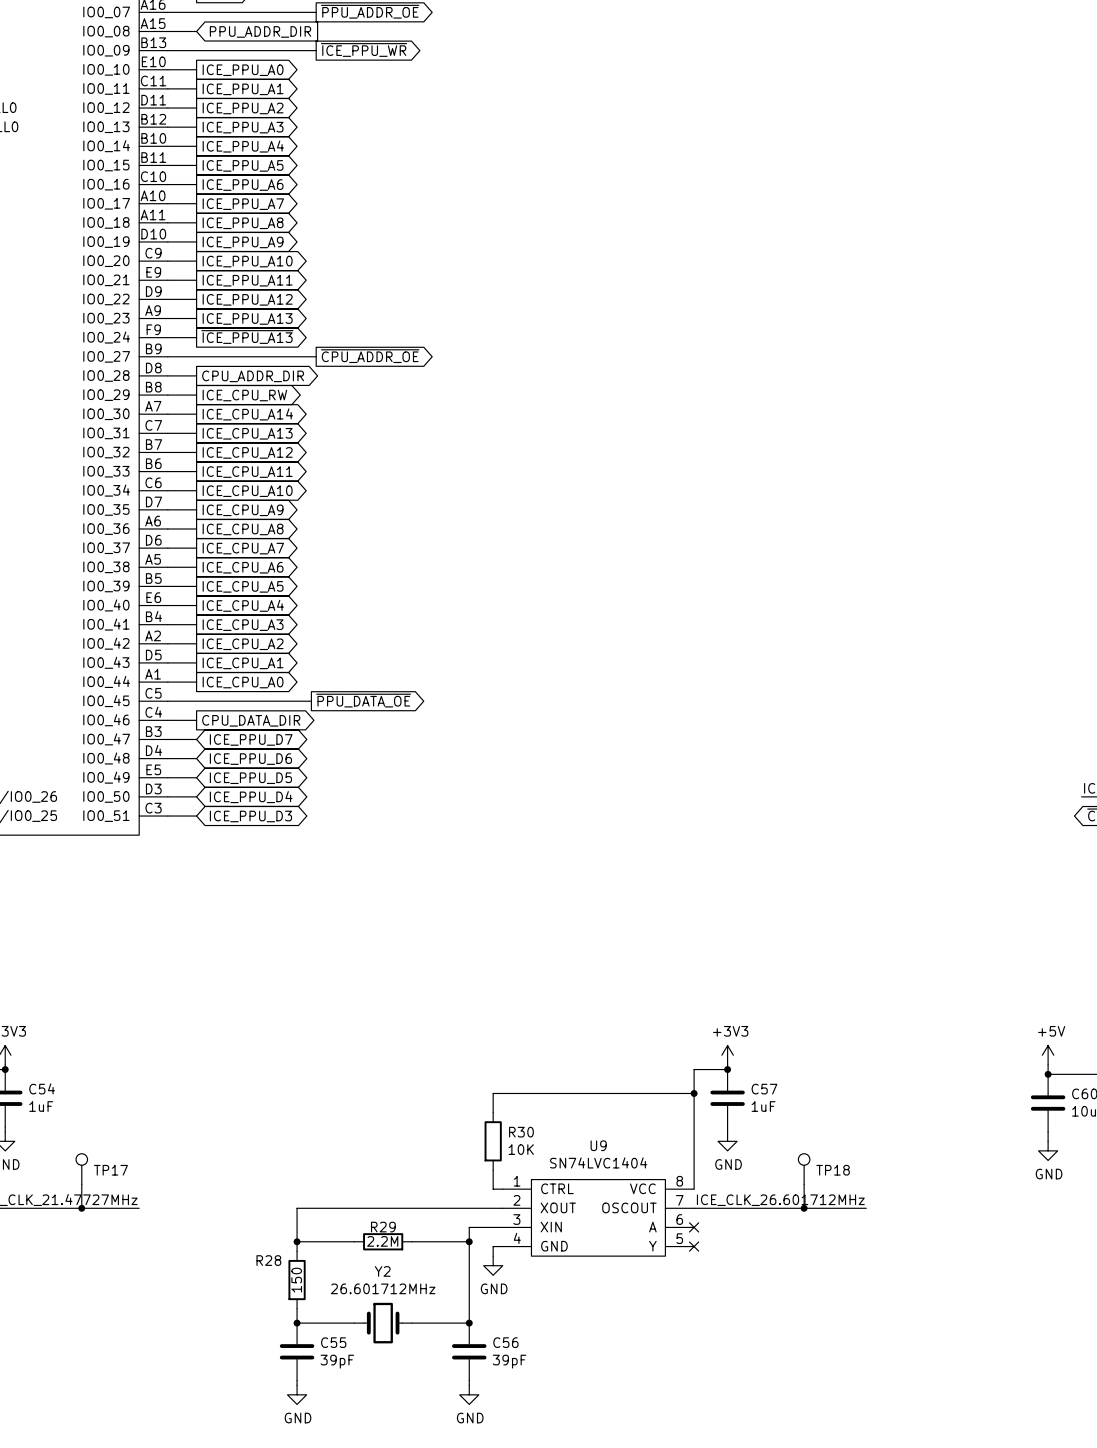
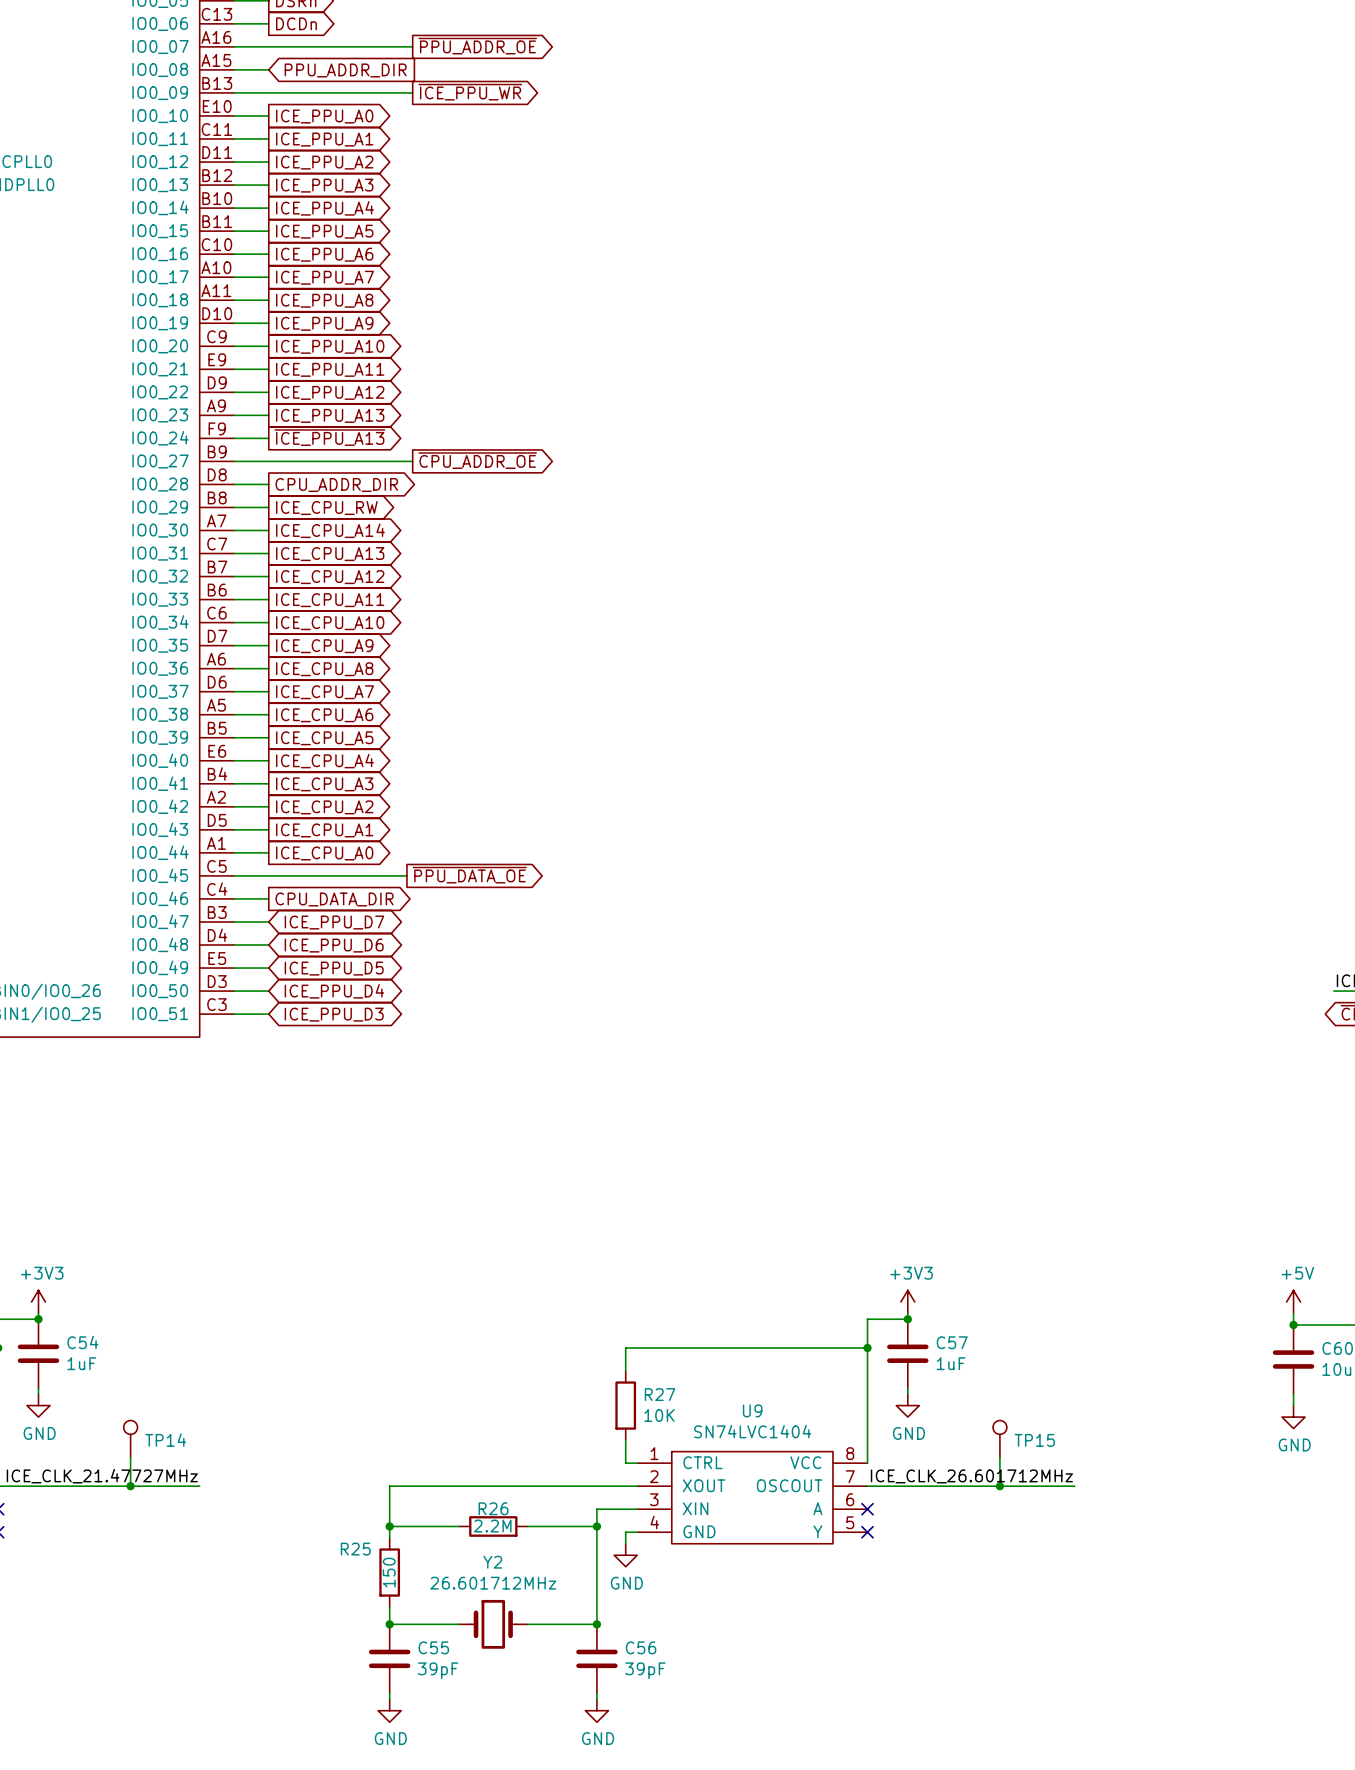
R30 name: R30 (521, 1132) -> R27 (660, 1394)
TP17 name: TP17 (110, 1170) -> TP14 (165, 1440)
TP18 name: TP18 (833, 1170) -> TP15 (1034, 1440)
R29 name: R29 (383, 1227) -> R26 (493, 1508)
R28 name: R28 (268, 1260) -> R25 (355, 1549)

